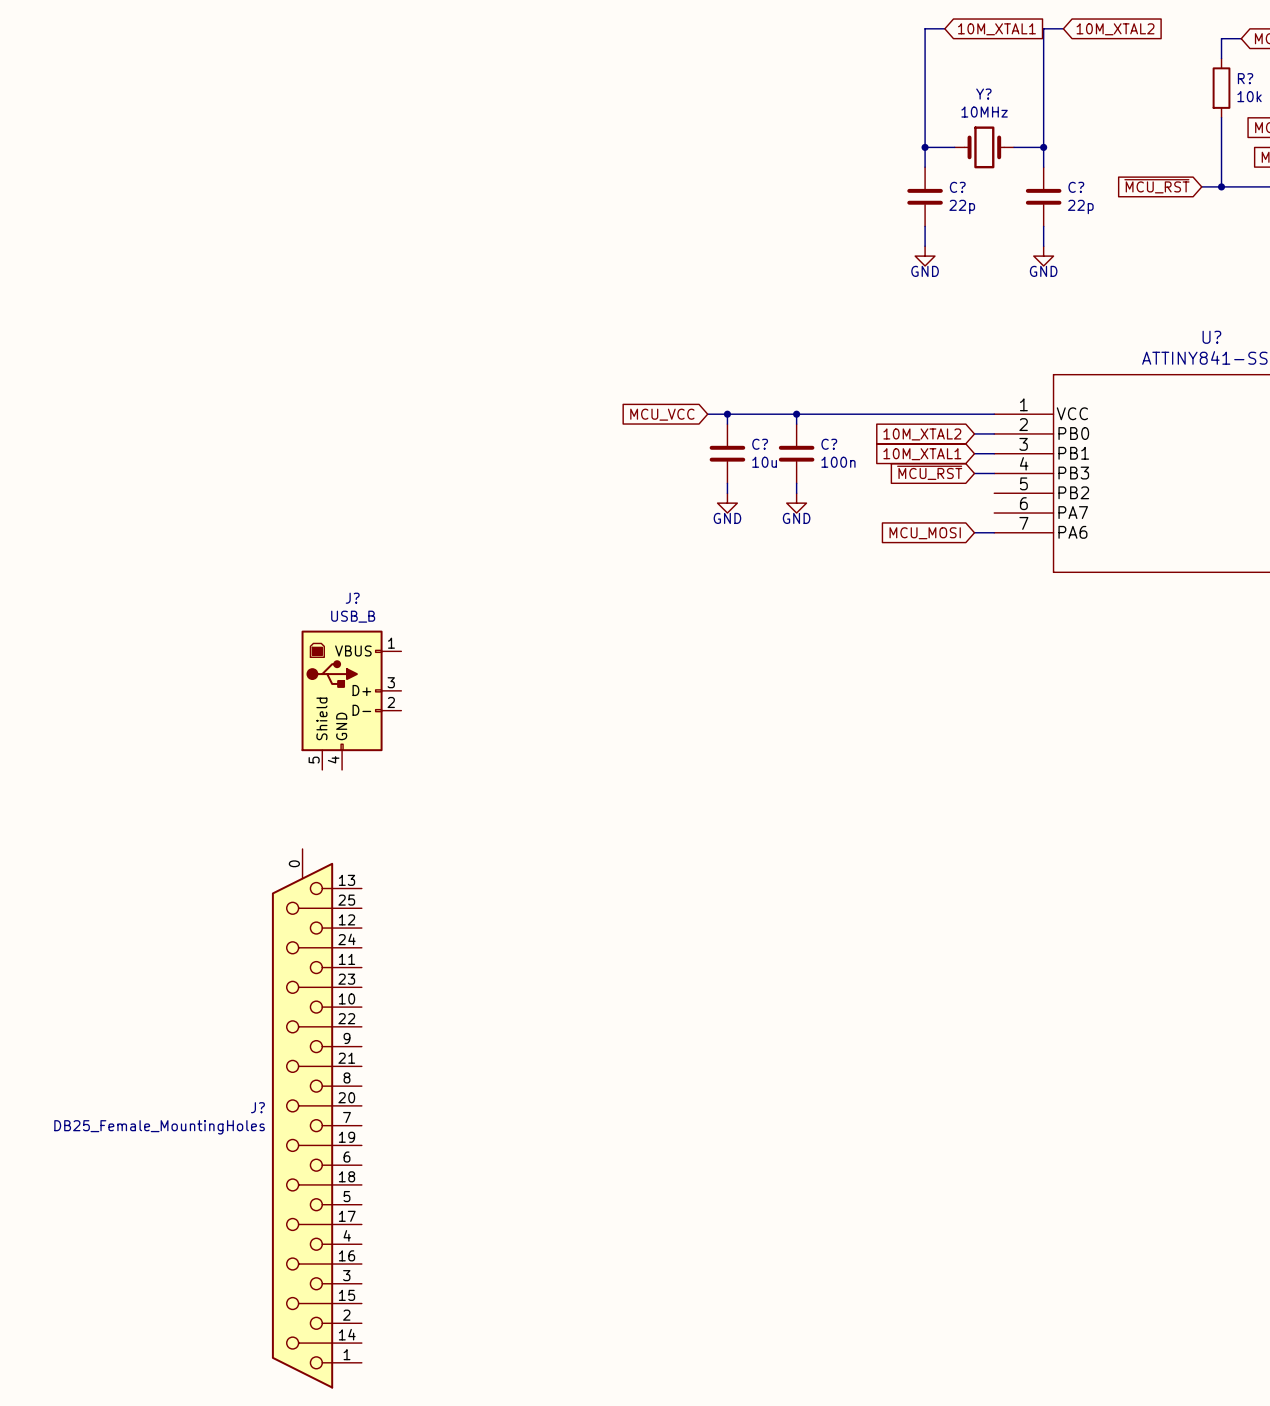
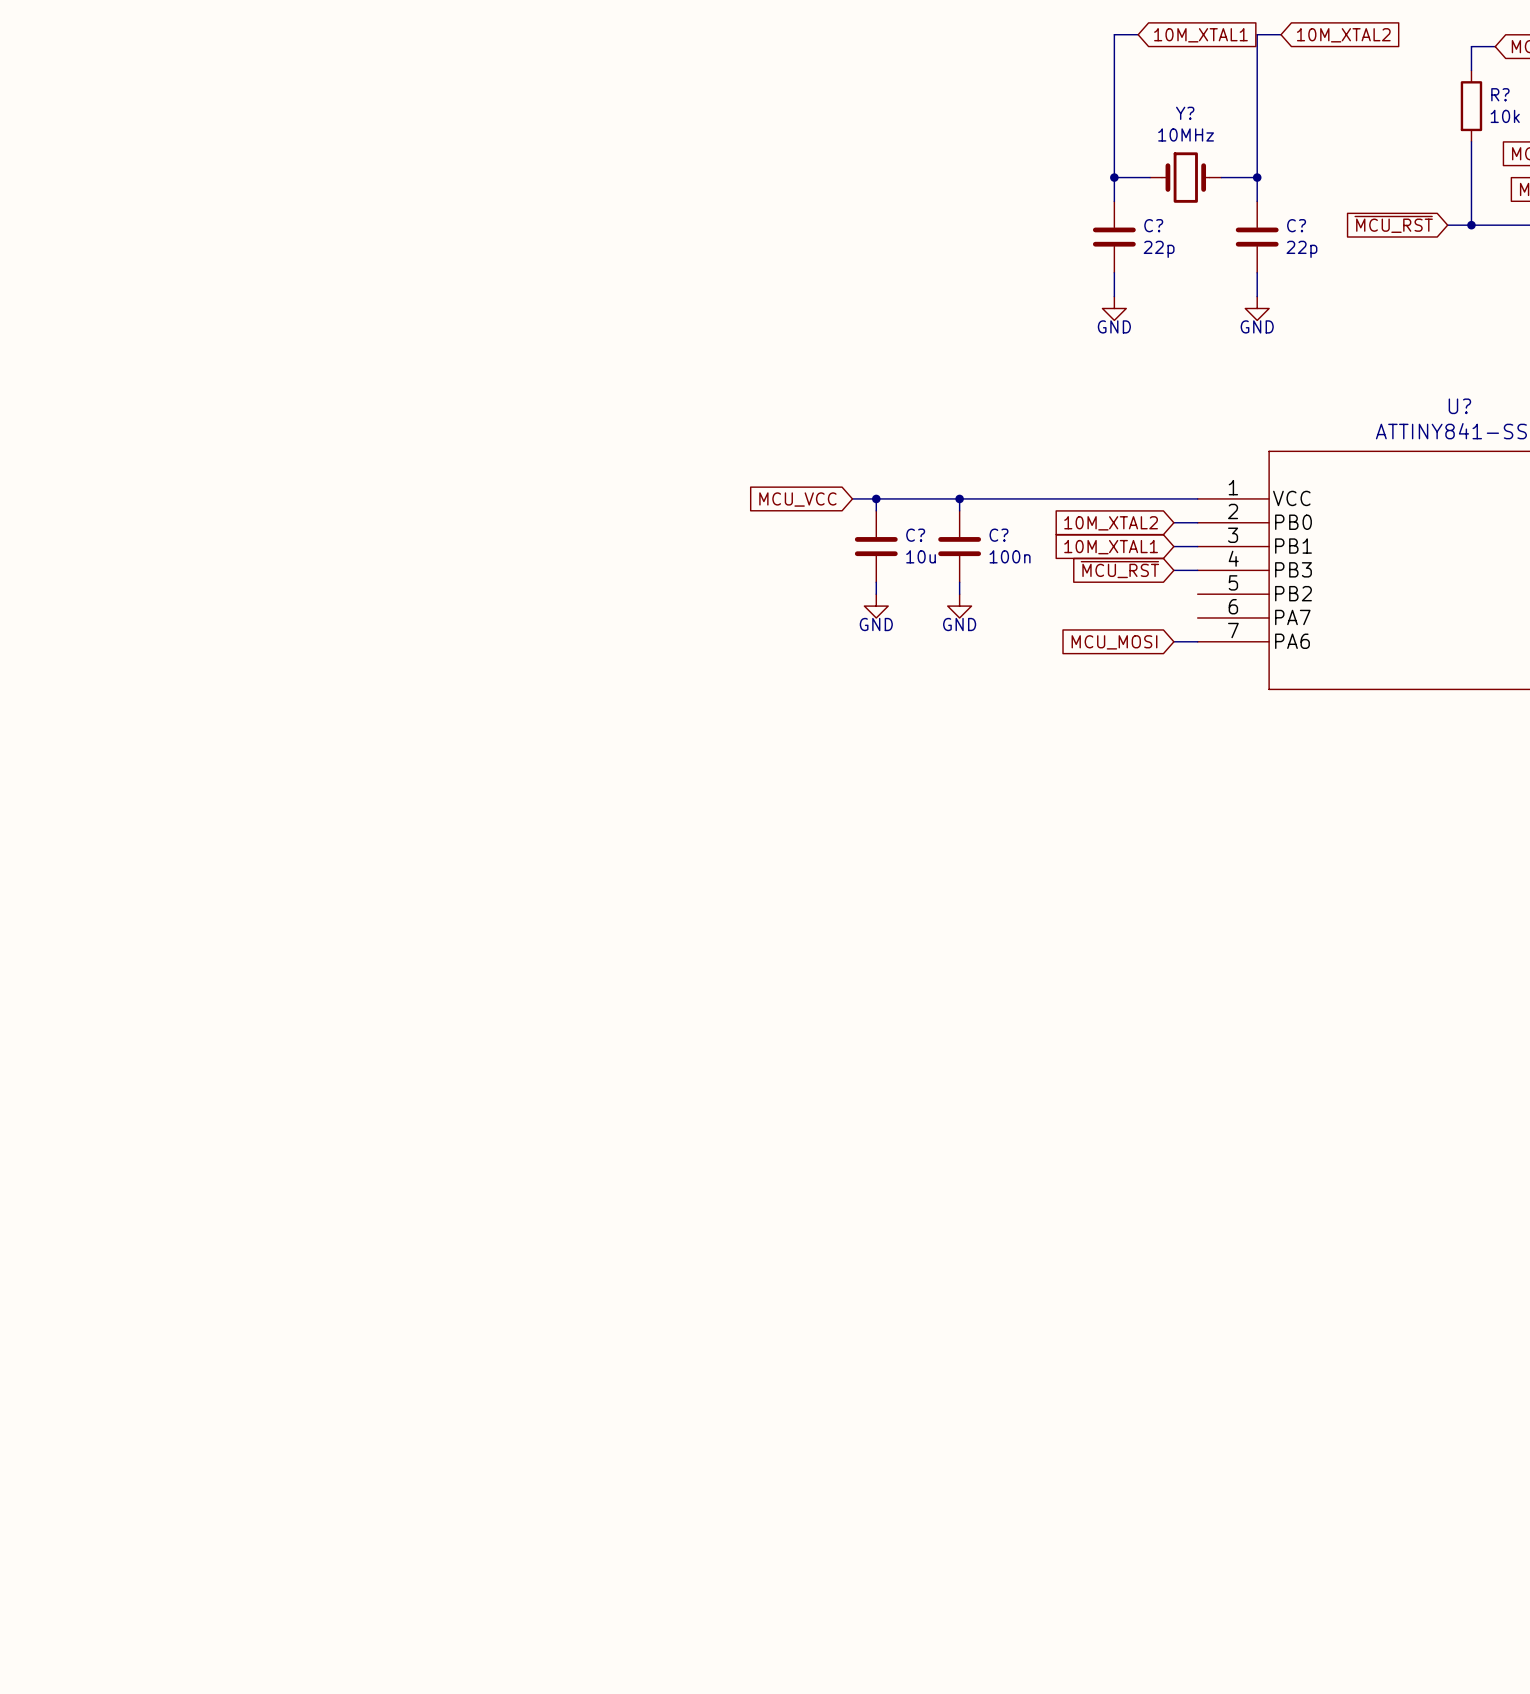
J?: USB_B (351, 700) -> none
J?: DB25_Female_MountingHoles (316, 1118) -> none

